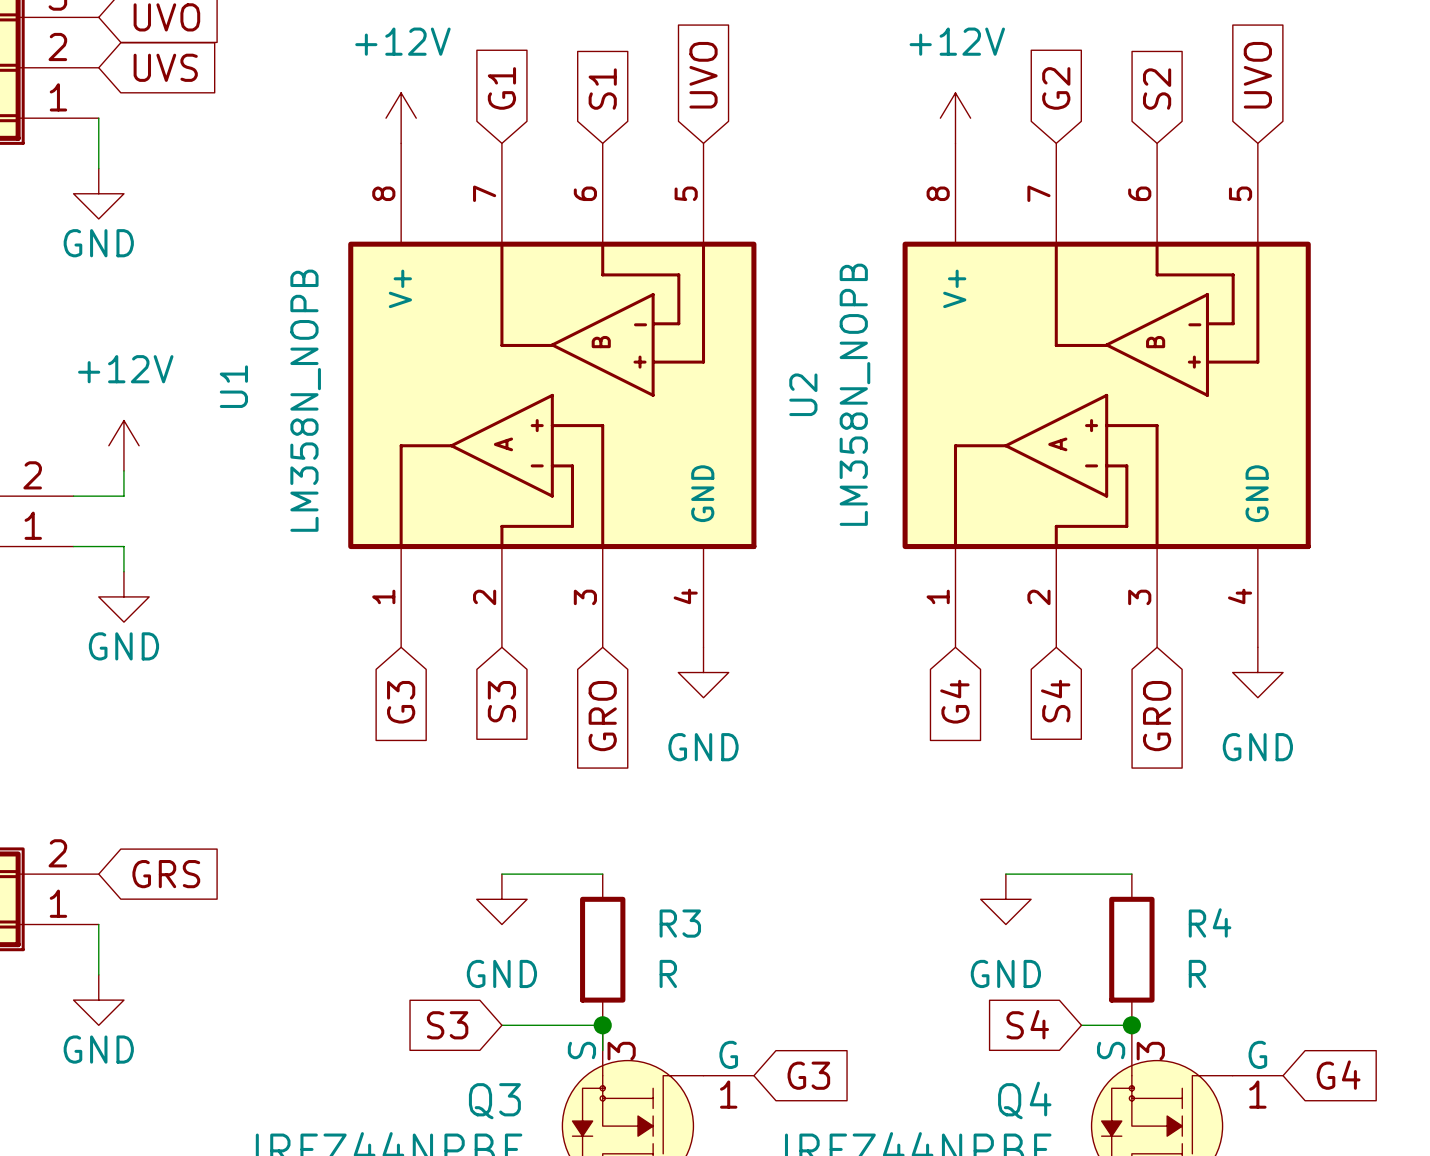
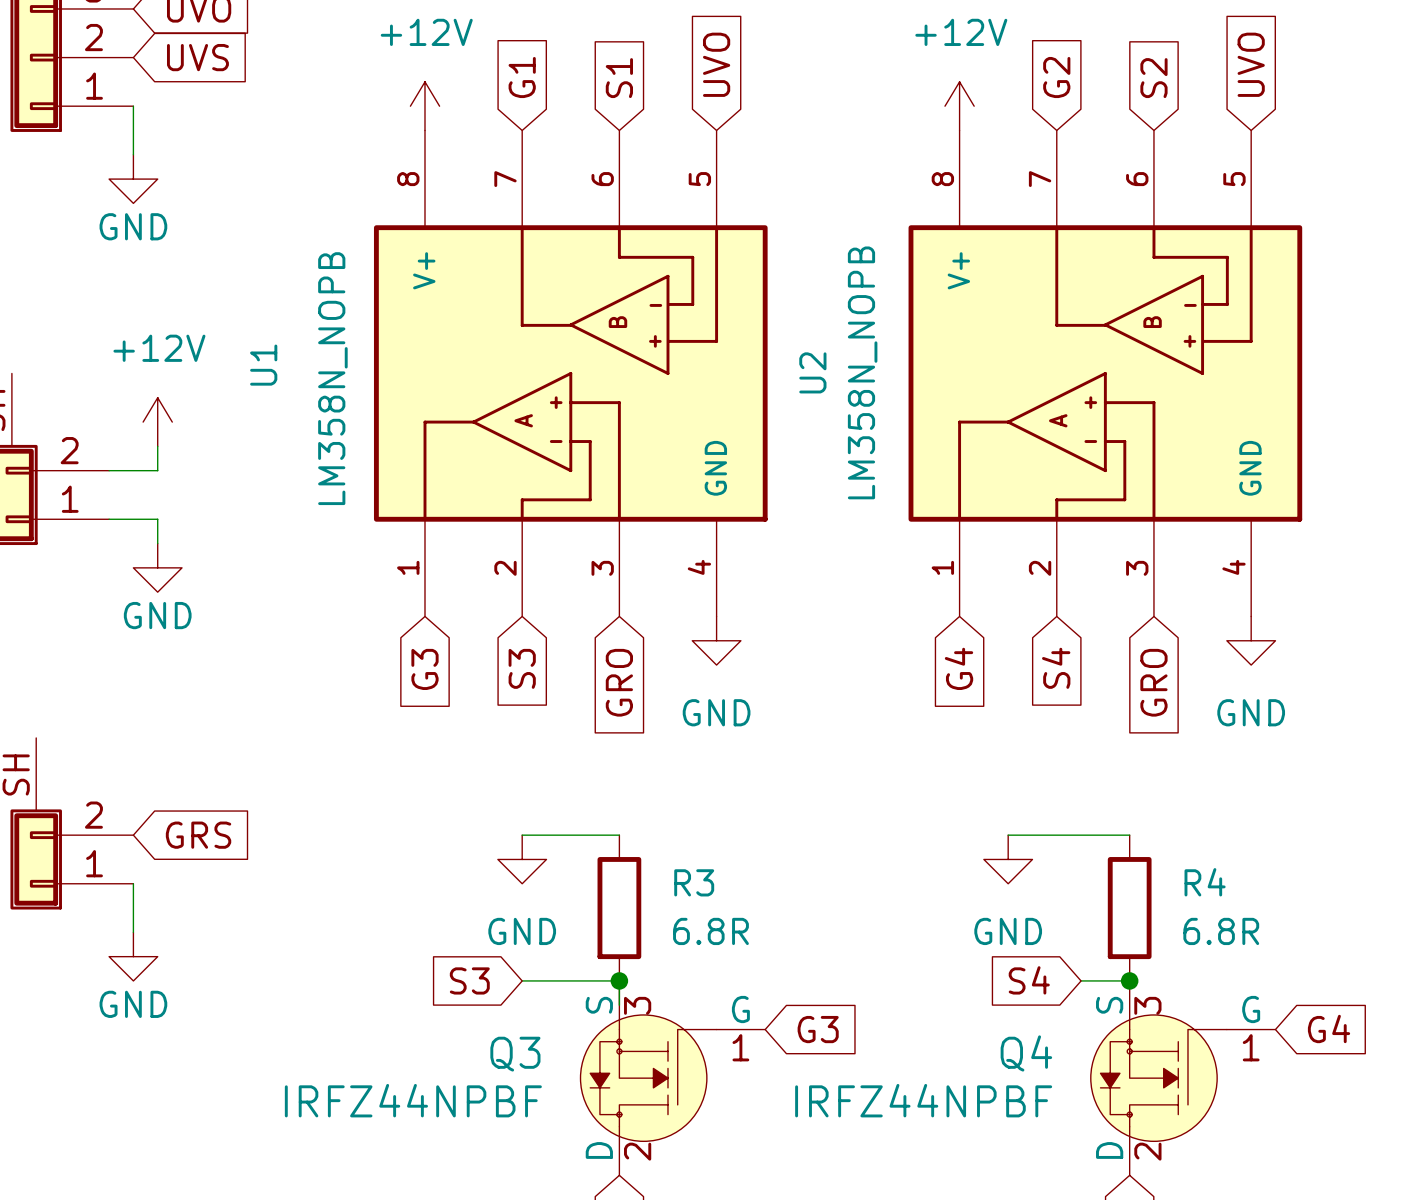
R3 value: R (668, 973) -> 6.8R (710, 931)
R4 value: R (1197, 973) -> 6.8R (1221, 931)

